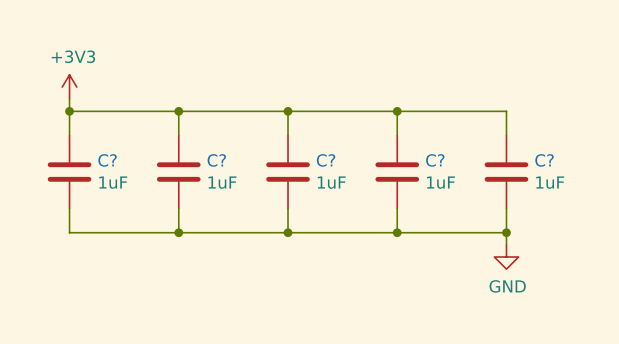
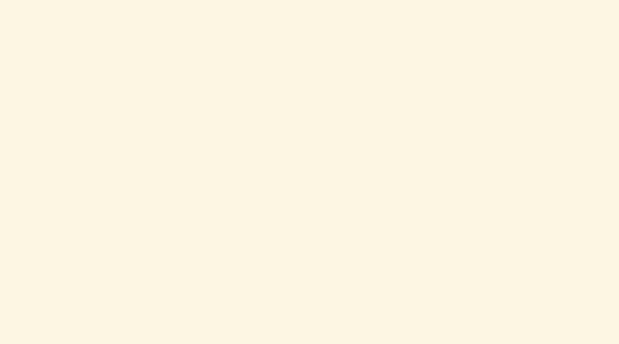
power symbol: +3V3 (69, 87) -> none
wire: (69, 99) (69, 135) -> none
wire: (69, 111) (506, 111) (506, 135) -> none
junction: (69, 111) -> none
wire: (178, 111) (178, 135) -> none
junction: (178, 111) -> none
wire: (288, 111) (288, 135) -> none
junction: (288, 111) -> none
wire: (397, 111) (397, 135) -> none
junction: (397, 111) -> none
C?: (69, 172) -> none
C?: (178, 172) -> none
C?: (288, 172) -> none
C?: (397, 172) -> none
C?: (506, 172) -> none
wire: (69, 208) (69, 232) (506, 232) -> none
wire: (178, 208) (178, 232) -> none
wire: (288, 208) (288, 232) -> none
wire: (397, 208) (397, 232) -> none
wire: (506, 208) (506, 244) -> none
junction: (178, 232) -> none
junction: (288, 232) -> none
junction: (397, 232) -> none
junction: (506, 232) -> none
power symbol: GND (506, 256) -> none

